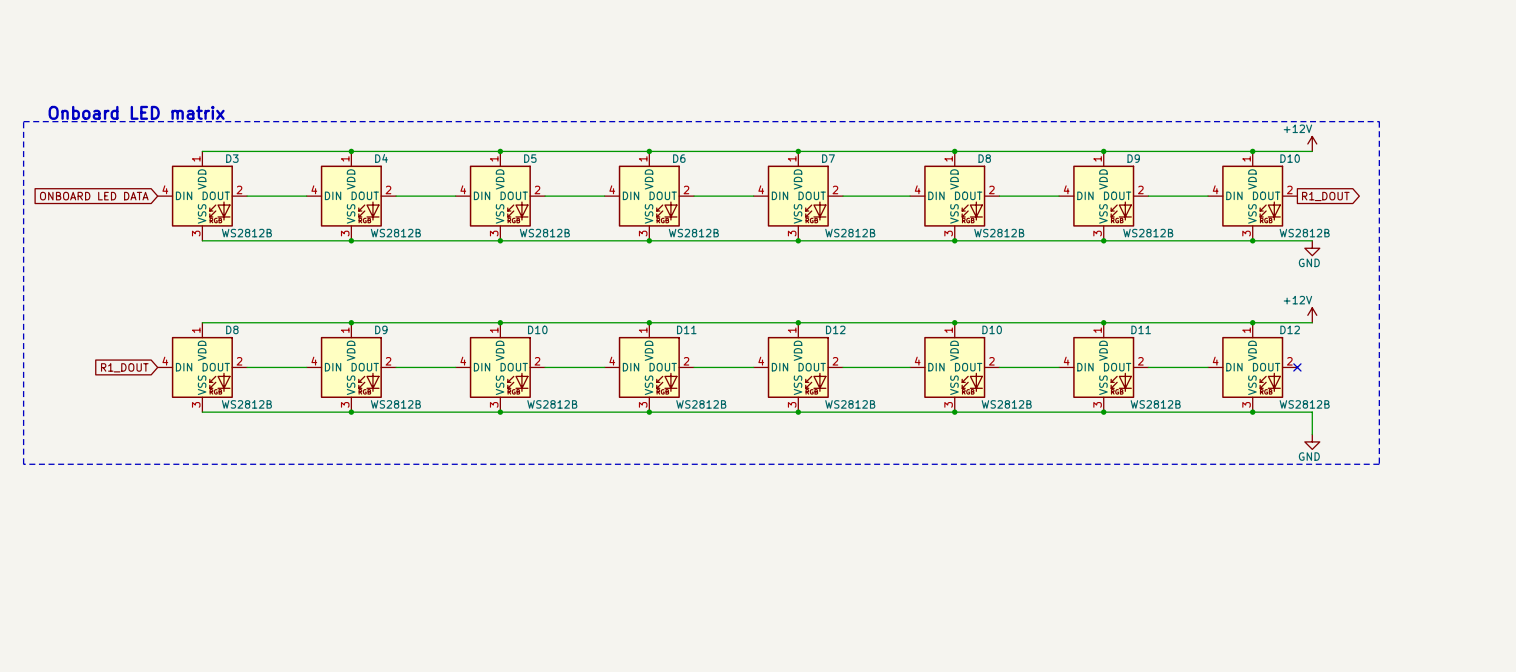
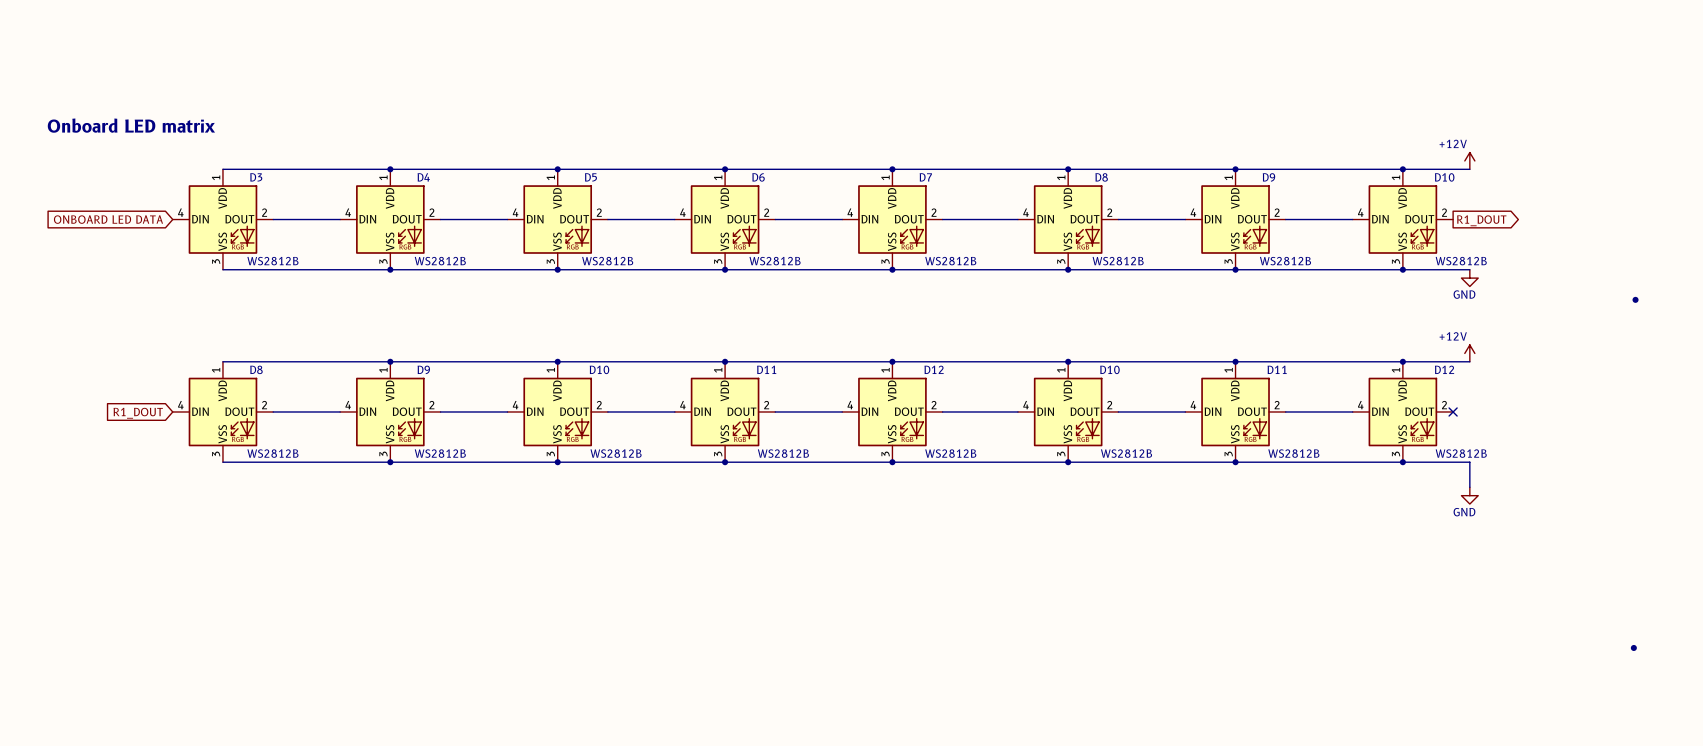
line: (23, 121) (1379, 121) (1379, 464) (23, 464) (23, 121) -> none
junction: none -> (1635, 299)
junction: none -> (1633, 647)

